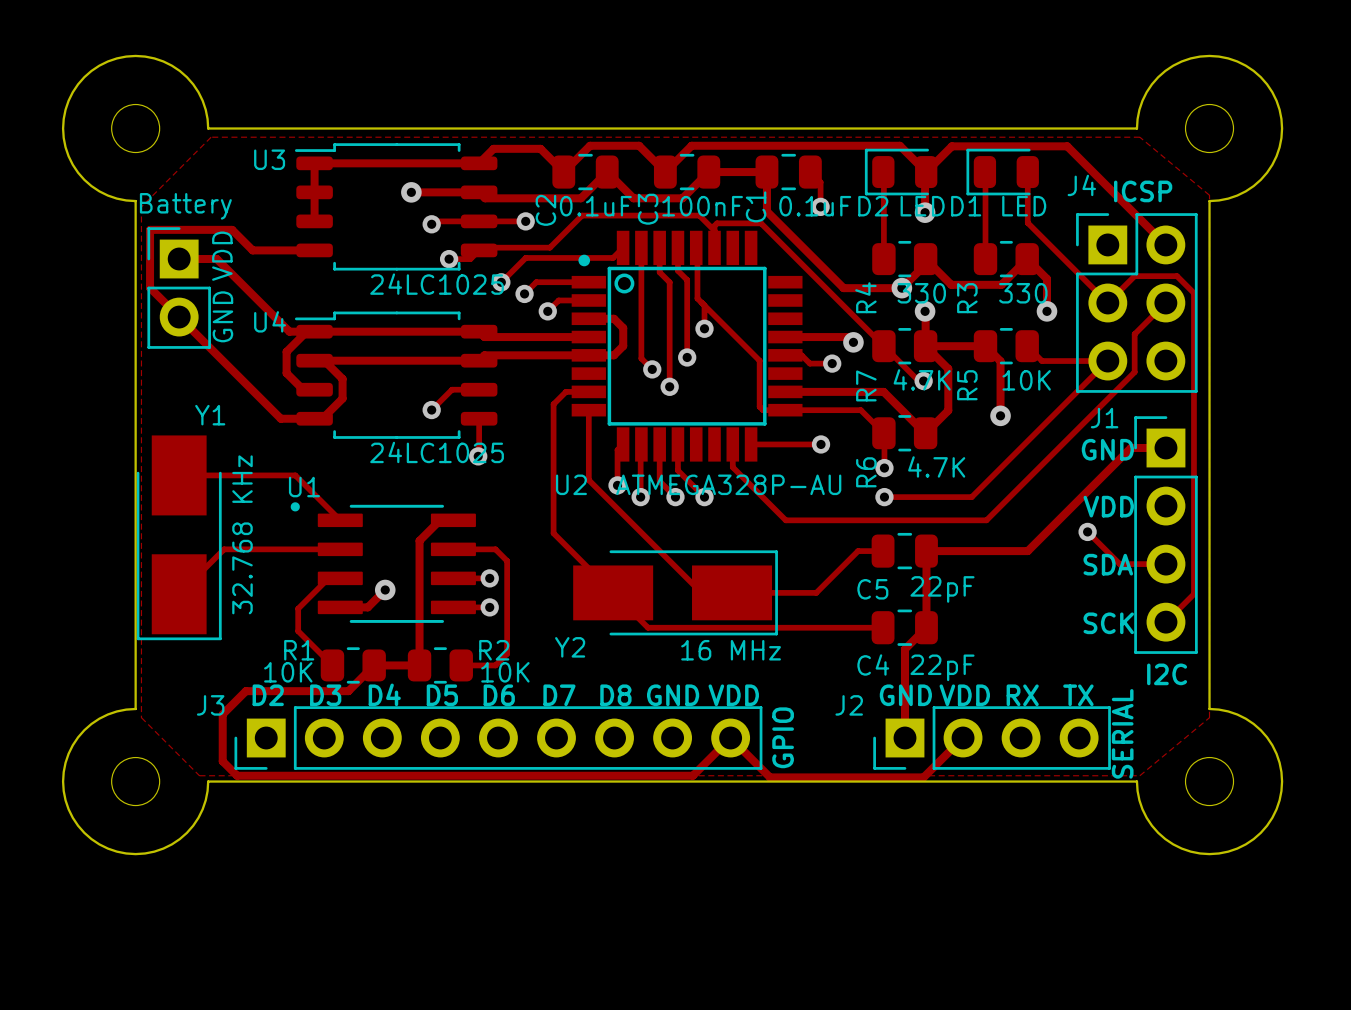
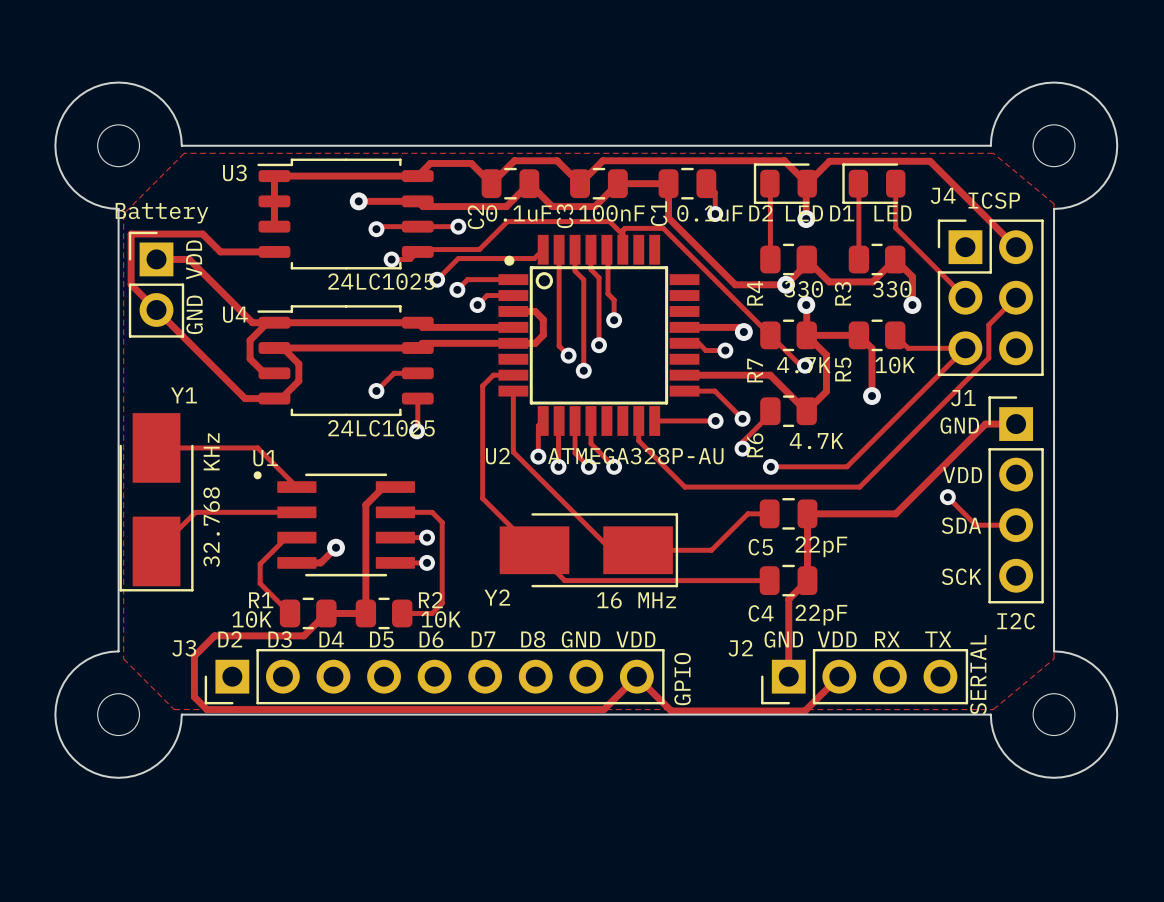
track: (1107, 302) (1134, 276) (1176, 276) (1193, 293) (1193, 594) (1165, 622) -> none
track: (704, 305) (759, 360) (759, 406) (763, 410) (785, 410) -> none
track: (820, 410) (860, 410) (884, 433) (884, 468) -> (714, 391) (742, 418)
track: none -> (770, 411) (770, 414) (742, 442) (742, 448)
via: none -> (742, 418)
via: (884, 468) -> none
via: none -> (742, 448)

